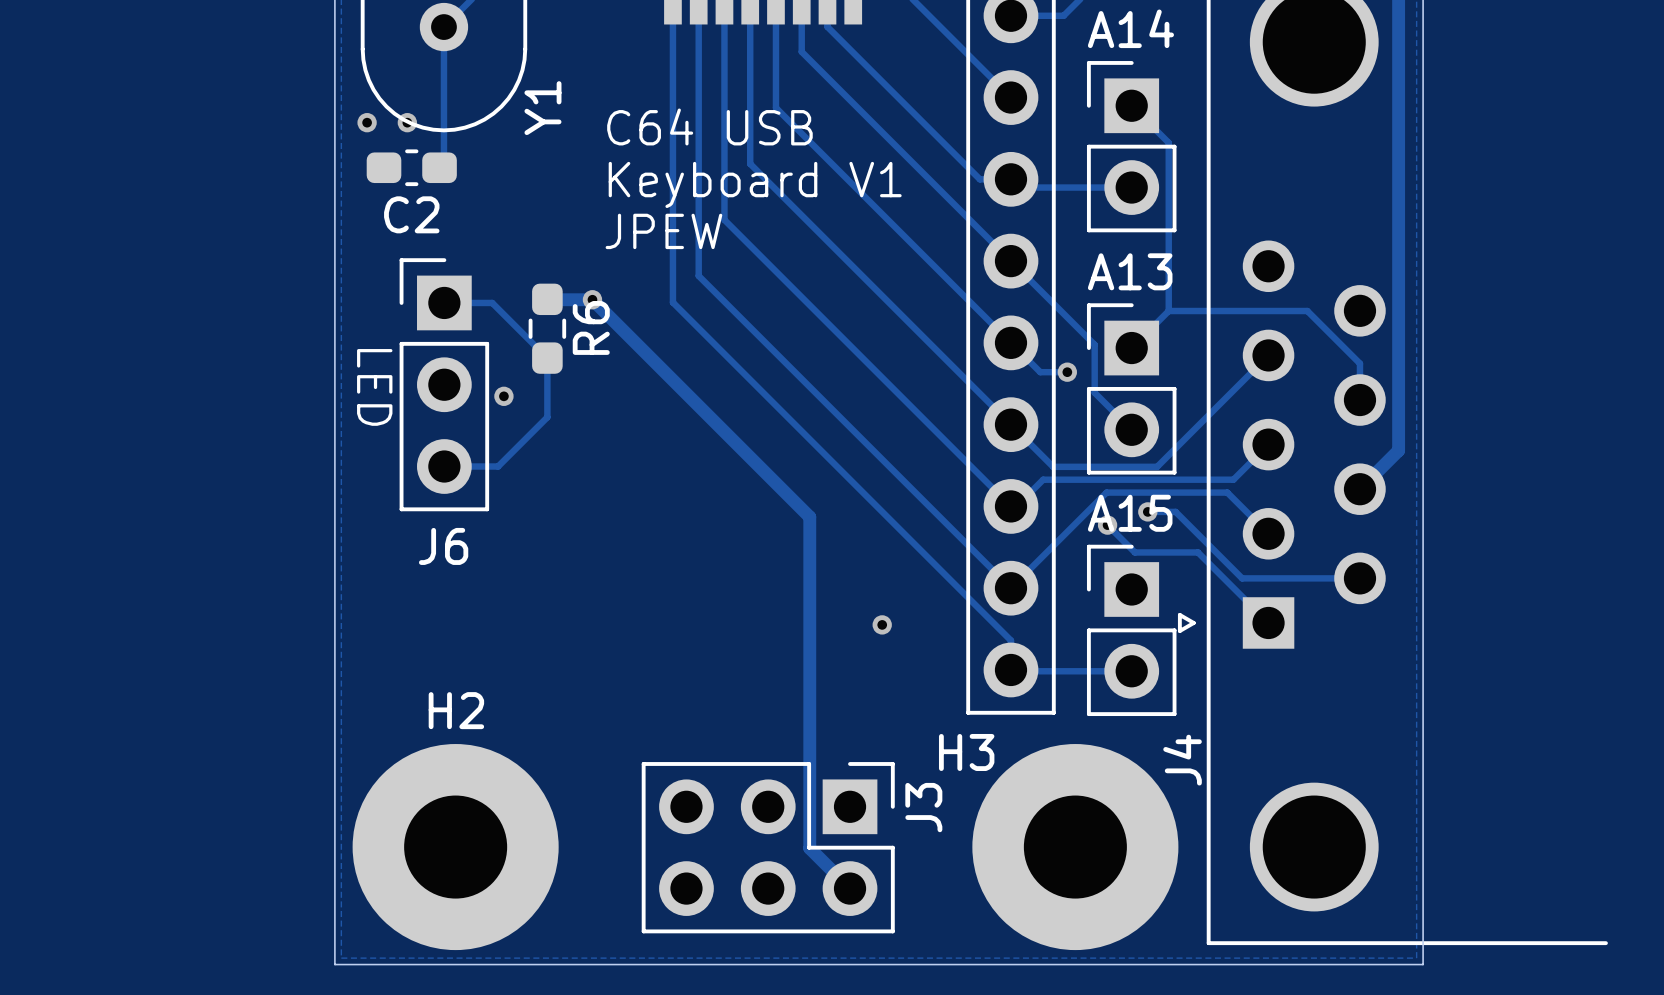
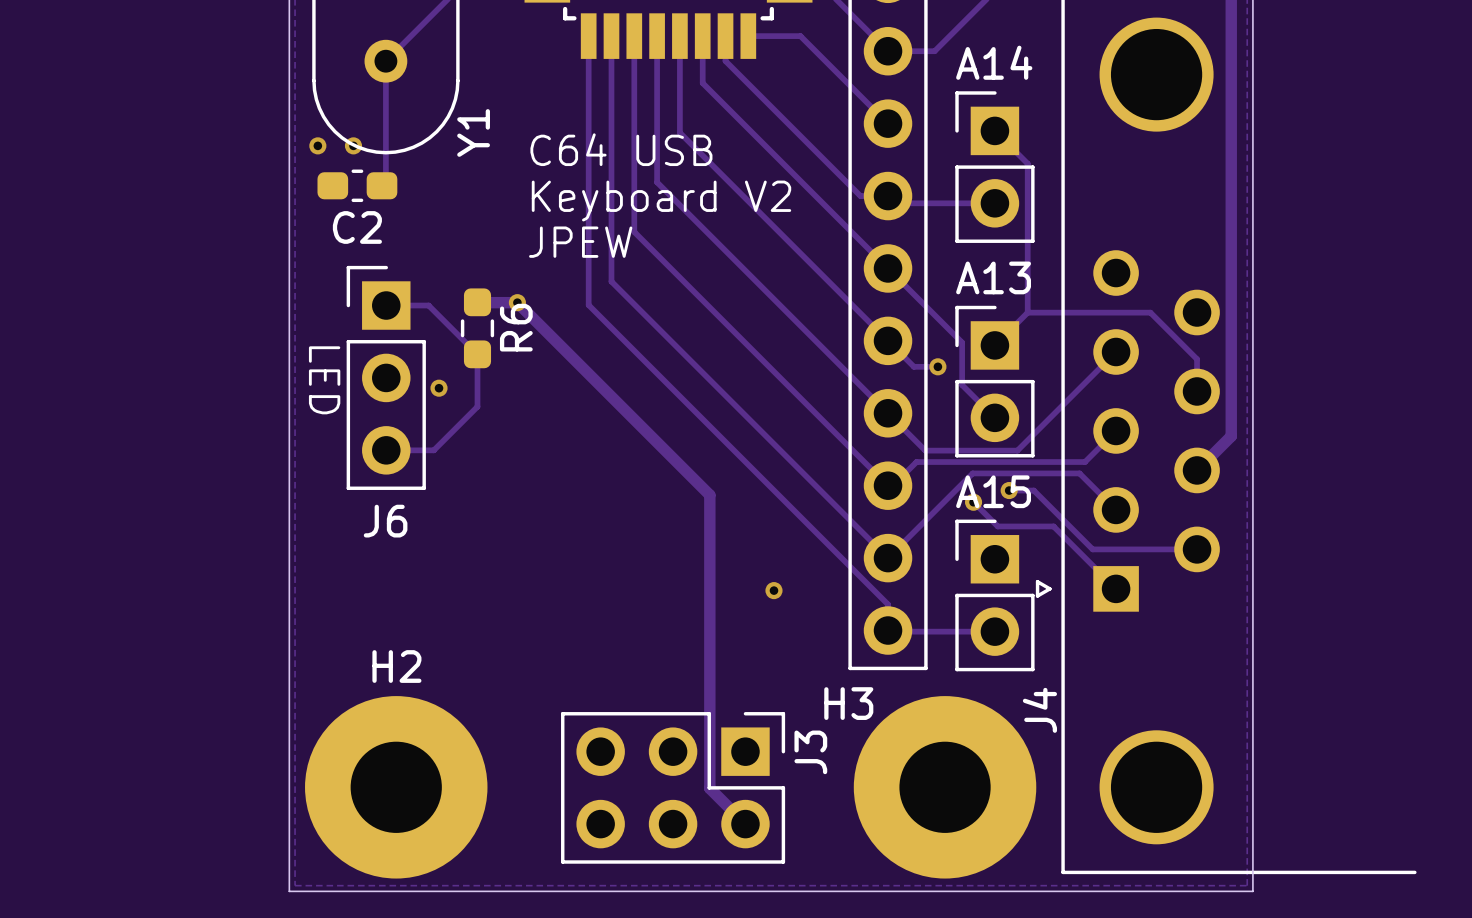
text: Keyboard V1 (755, 184) -> Keyboard V2 (661, 201)

